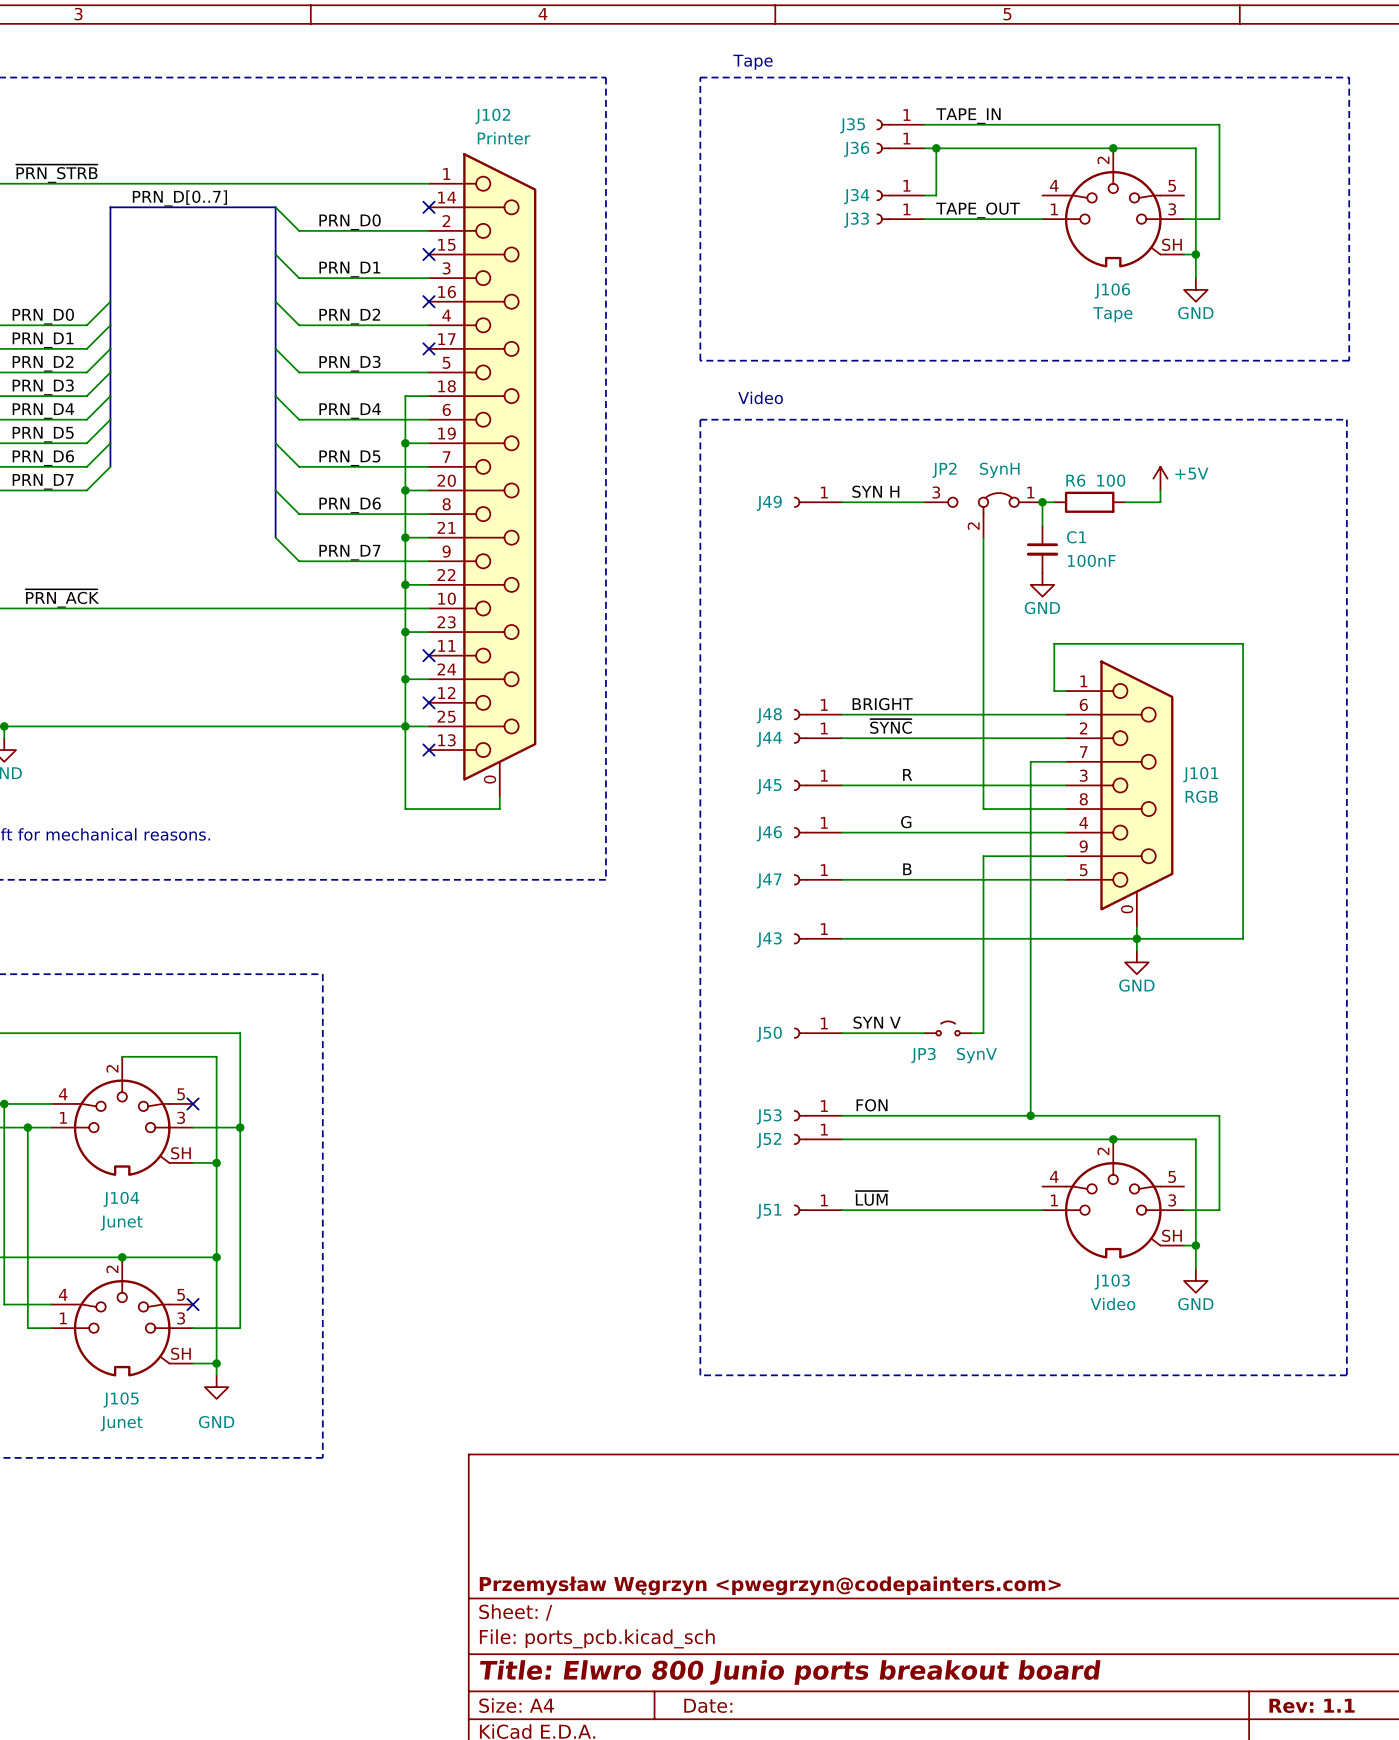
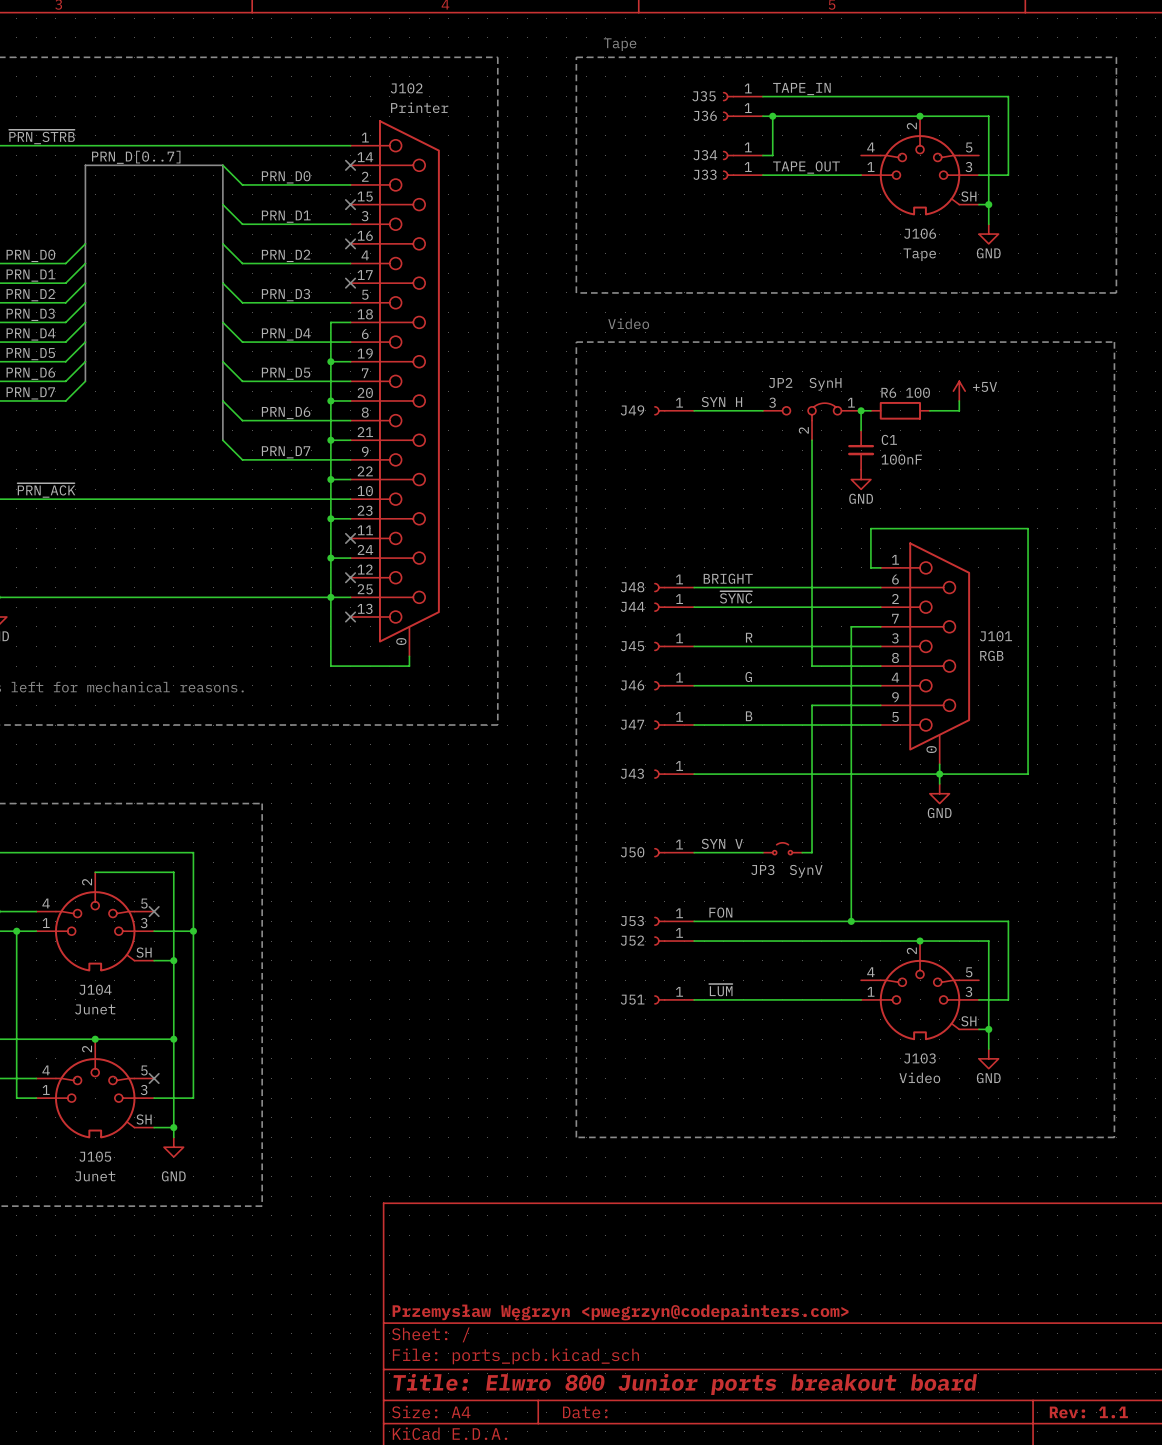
title block: Title: Elwro 800 Junio ports breakout board (790, 1672) -> Title: Elwro 800 Junior ports breakout board (685, 1384)

